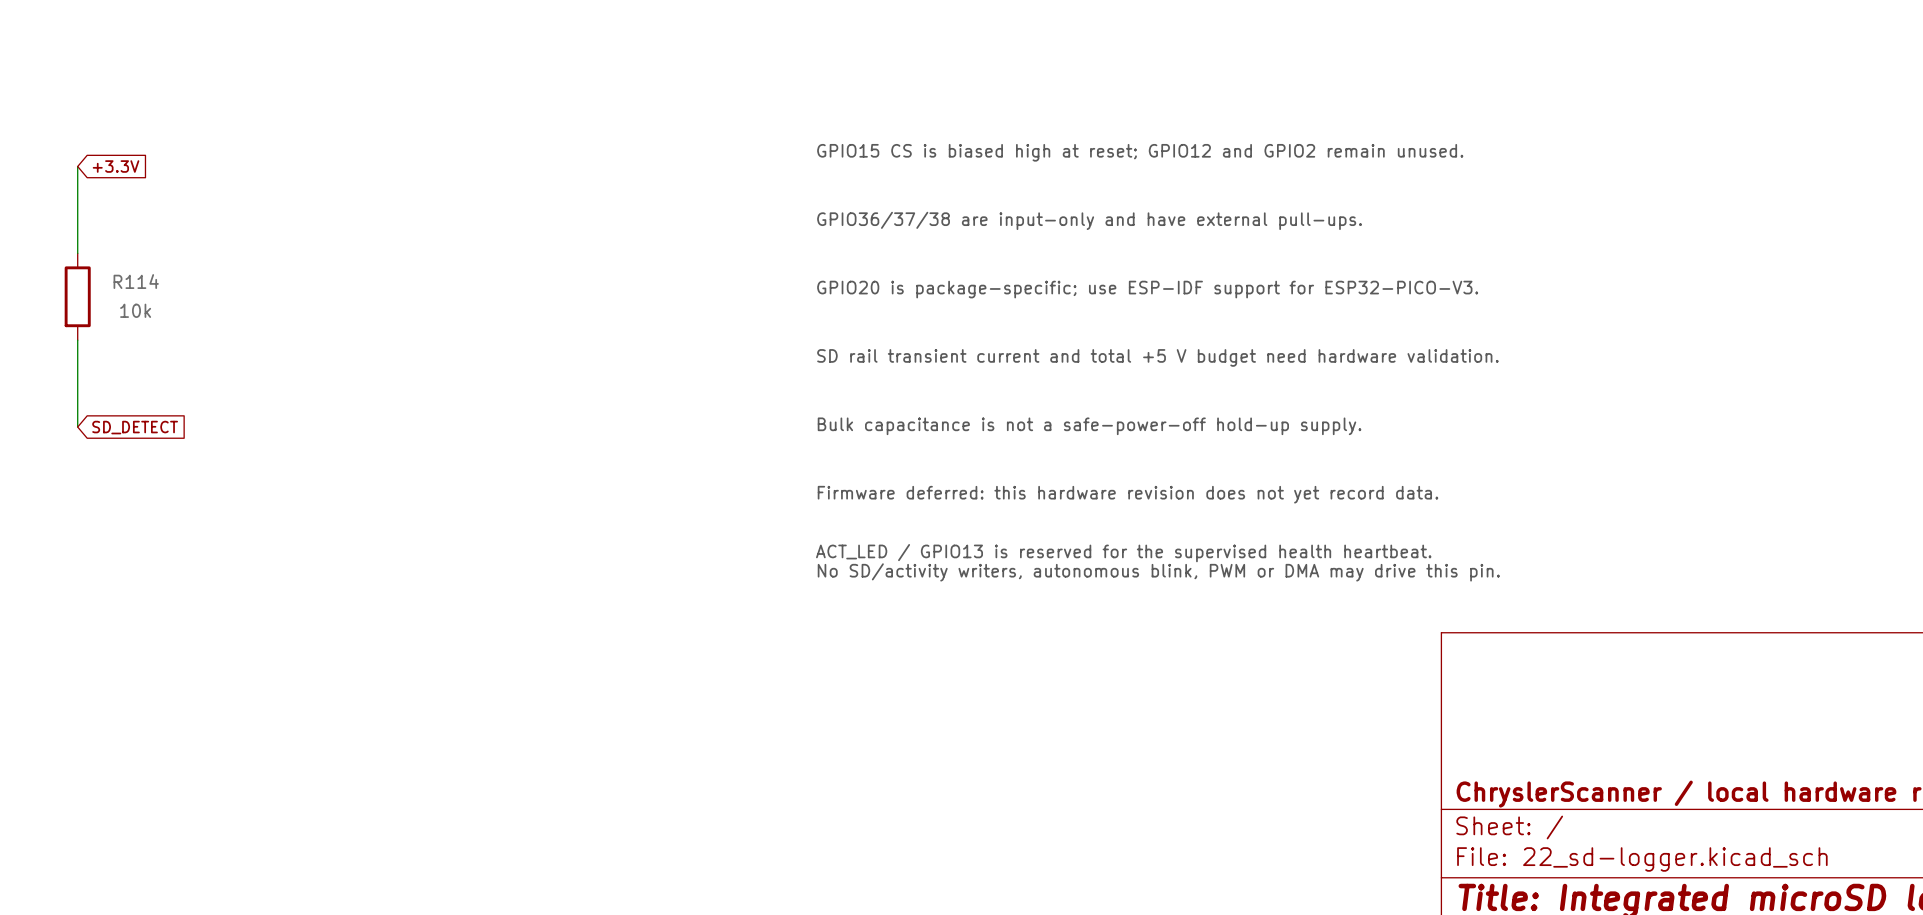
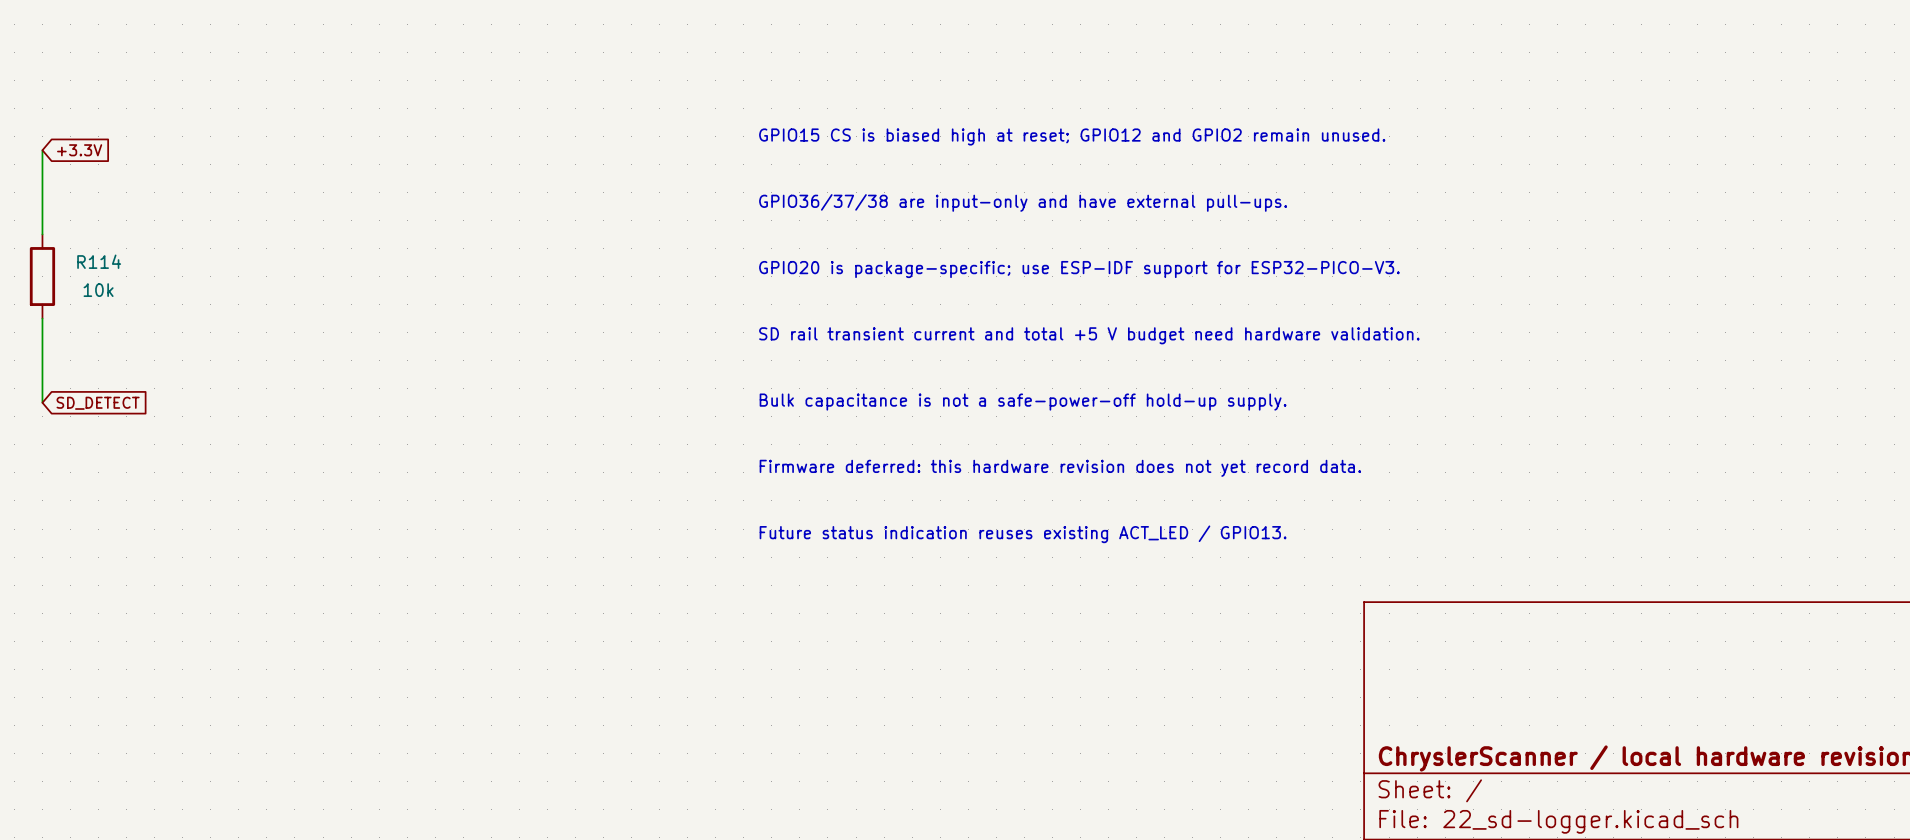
text: ACT_LED / GPIO13 is reserved for the supervised health heartbeat. (1123, 553) -> none
text: none -> Future status indication reuses existing ACT_LED / GPIO13. (1023, 534)
text: No SD/activity writers, autonomous blink, PWM or DMA may drive this pin. (1158, 572) -> none

